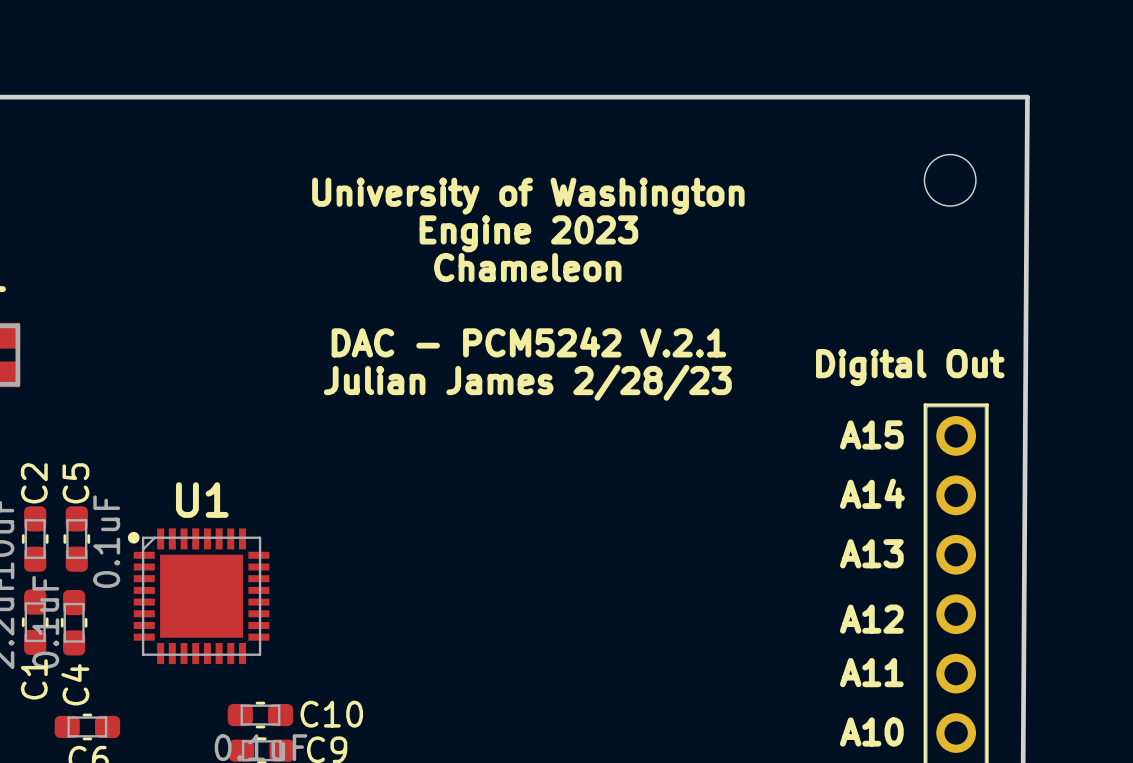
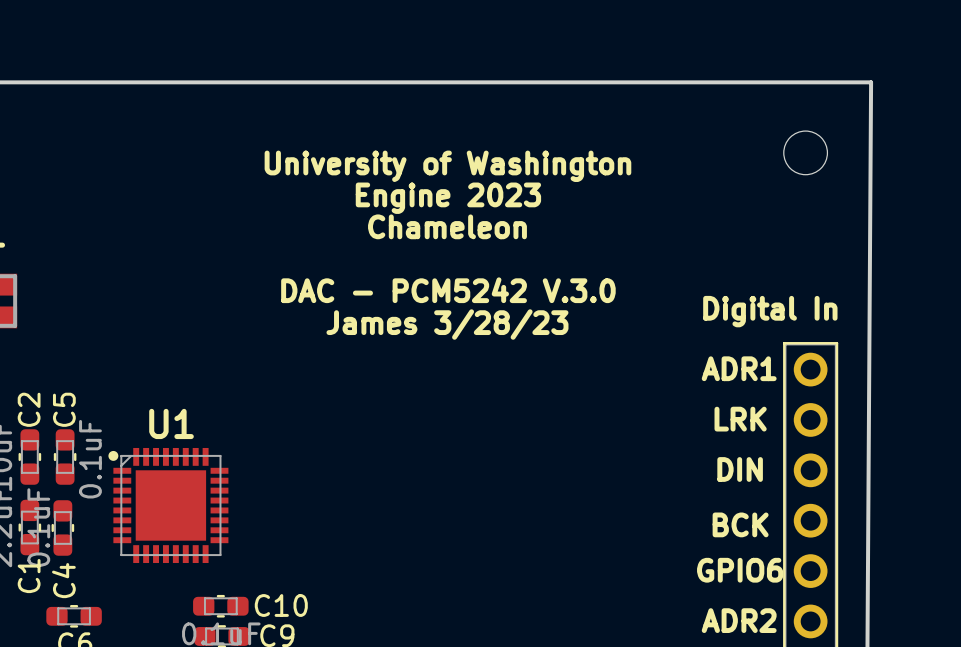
text: DAC - PCM5242 V.2.1 (528, 342) -> DAC - PCM5242 V.3.0 (448, 290)
text: Digital Out (910, 367) -> Digital In (770, 311)
text: Julian James 2/28/23 (527, 382) -> James 3/28/23 (447, 324)
text: A15 (871, 434) -> ADR1 (739, 368)
text: A14 (872, 493) -> LRK (740, 419)
text: A13 (871, 553) -> DIN (740, 469)
text: A12 (871, 619) -> BCK (740, 524)
text: A11 (871, 672) -> GPIO6 (740, 570)
text: A10 (871, 732) -> ADR2 (739, 620)

